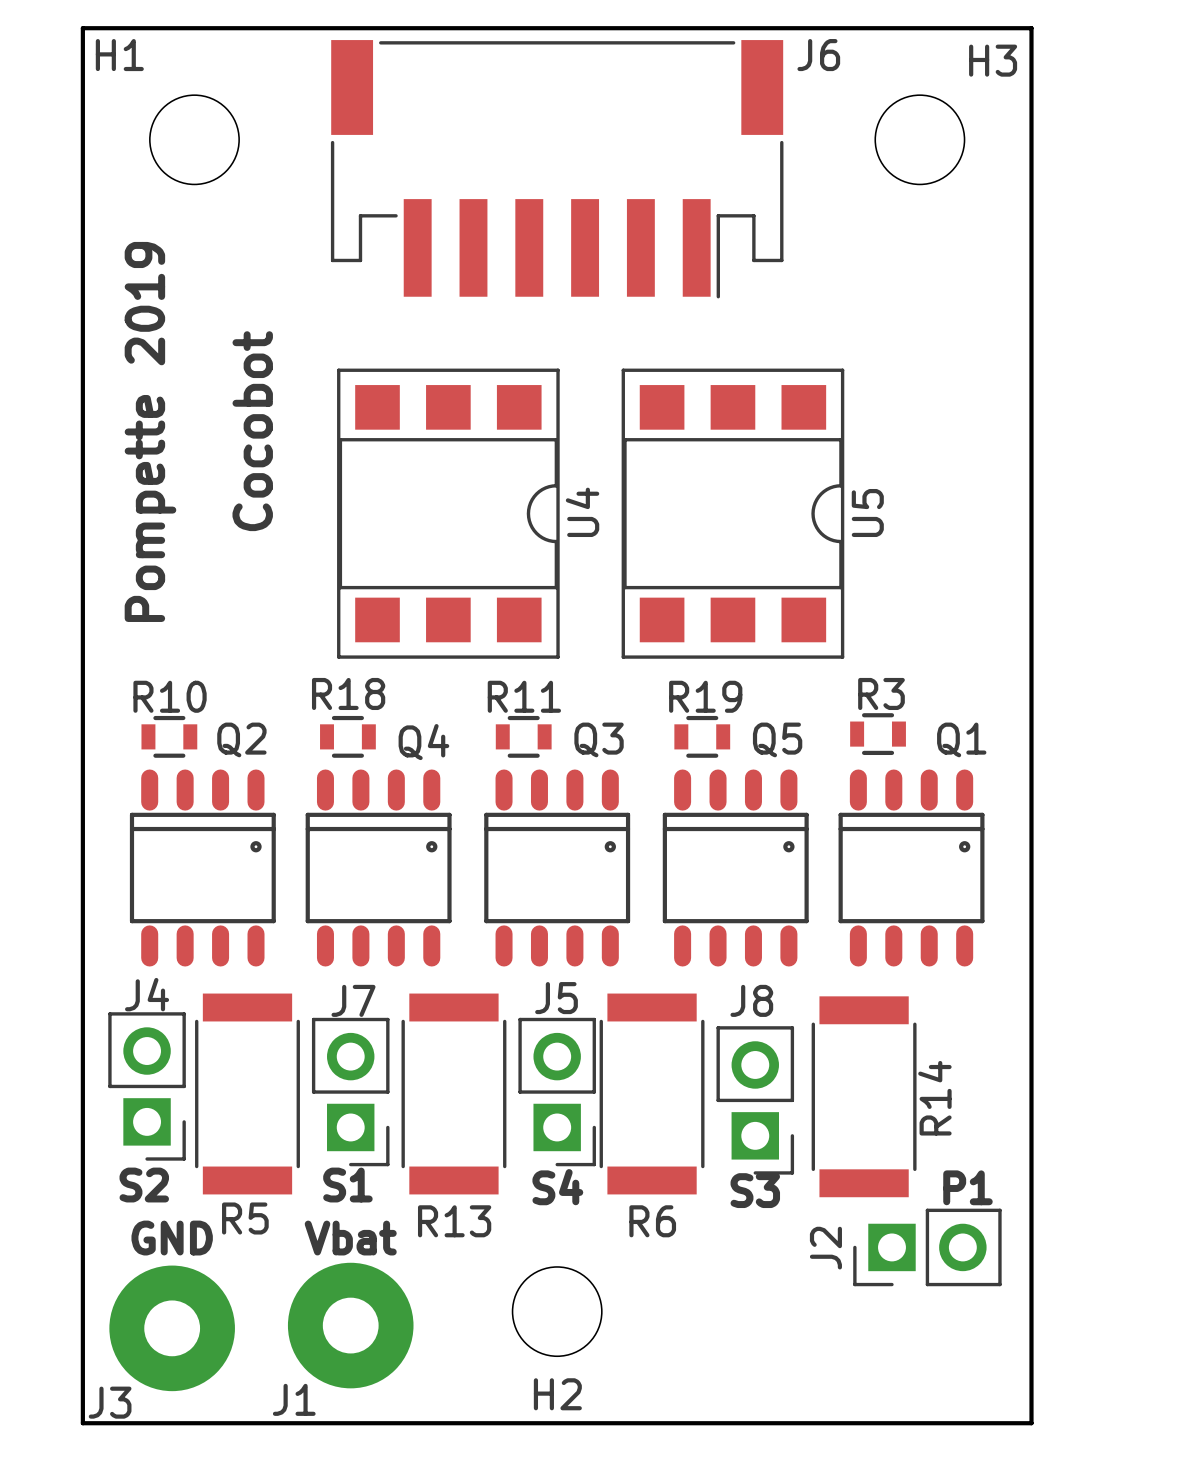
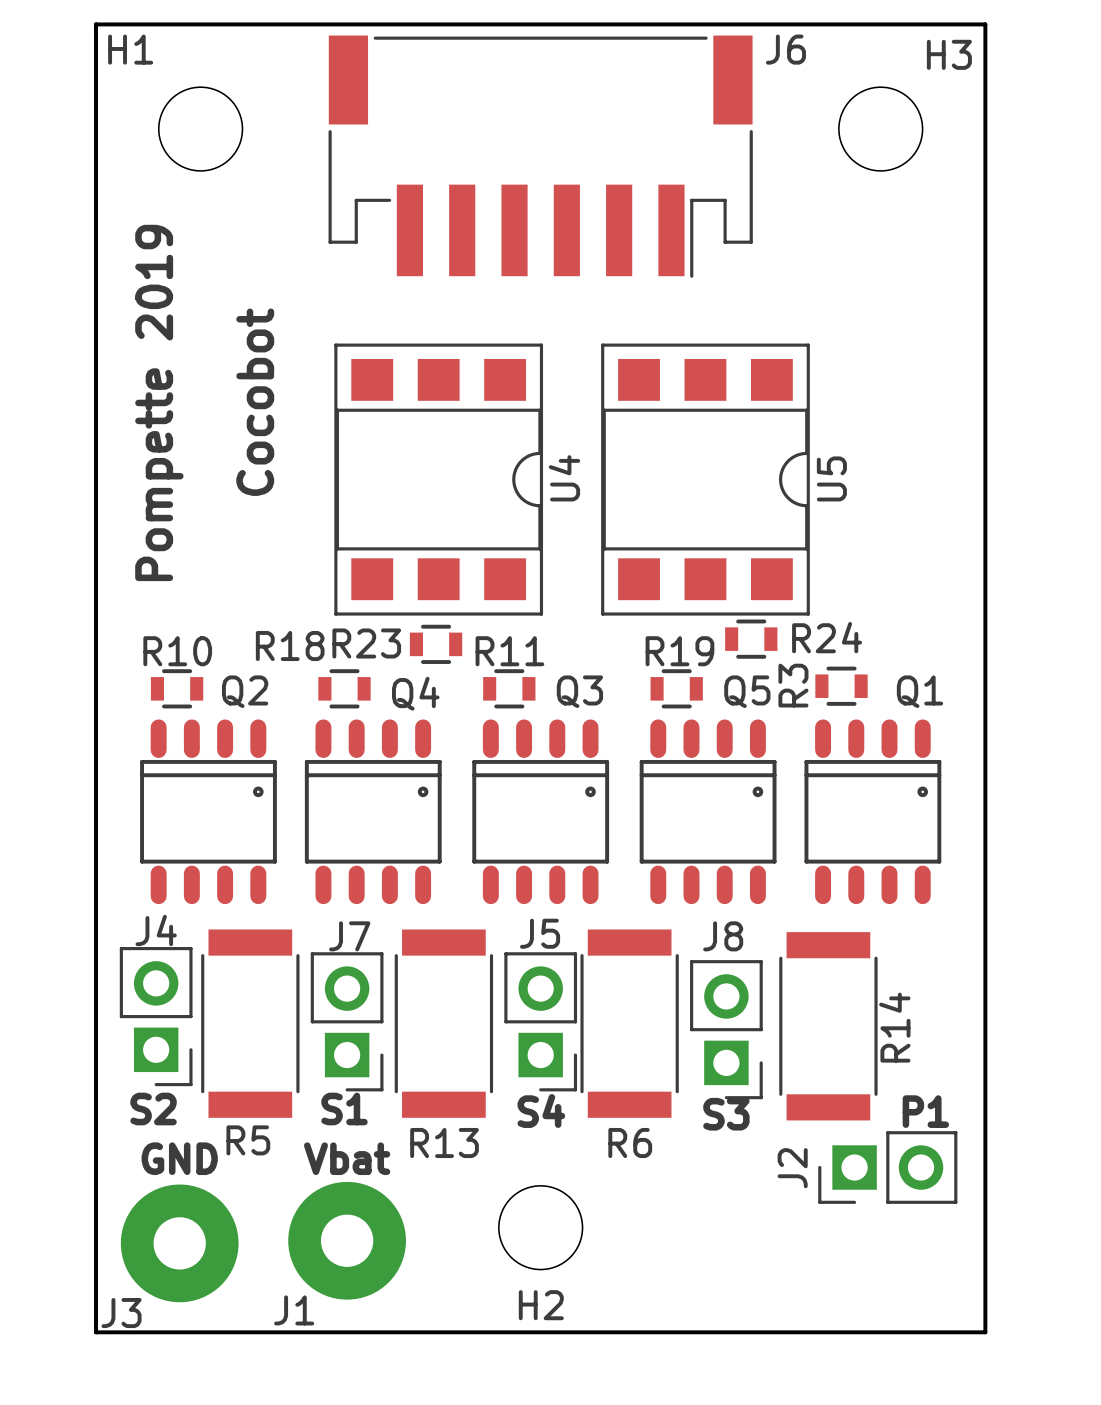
R24: none -> (751, 639)
R23: none -> (436, 644)
R18 name position: R18 (348, 693) -> R18 (290, 646)
R3 name rotation: 0° (881, 693) -> 90° counterclockwise (793, 685)

